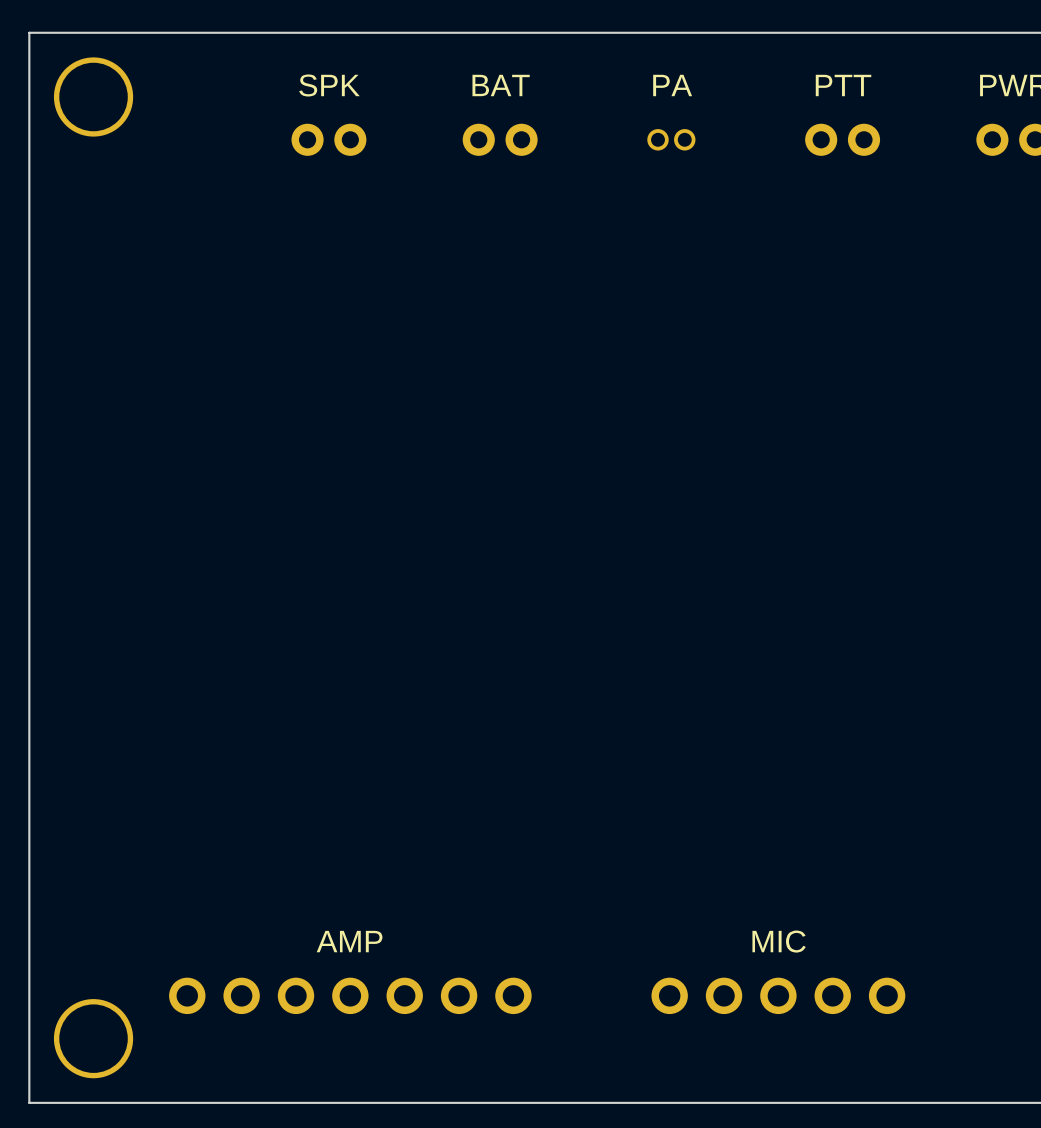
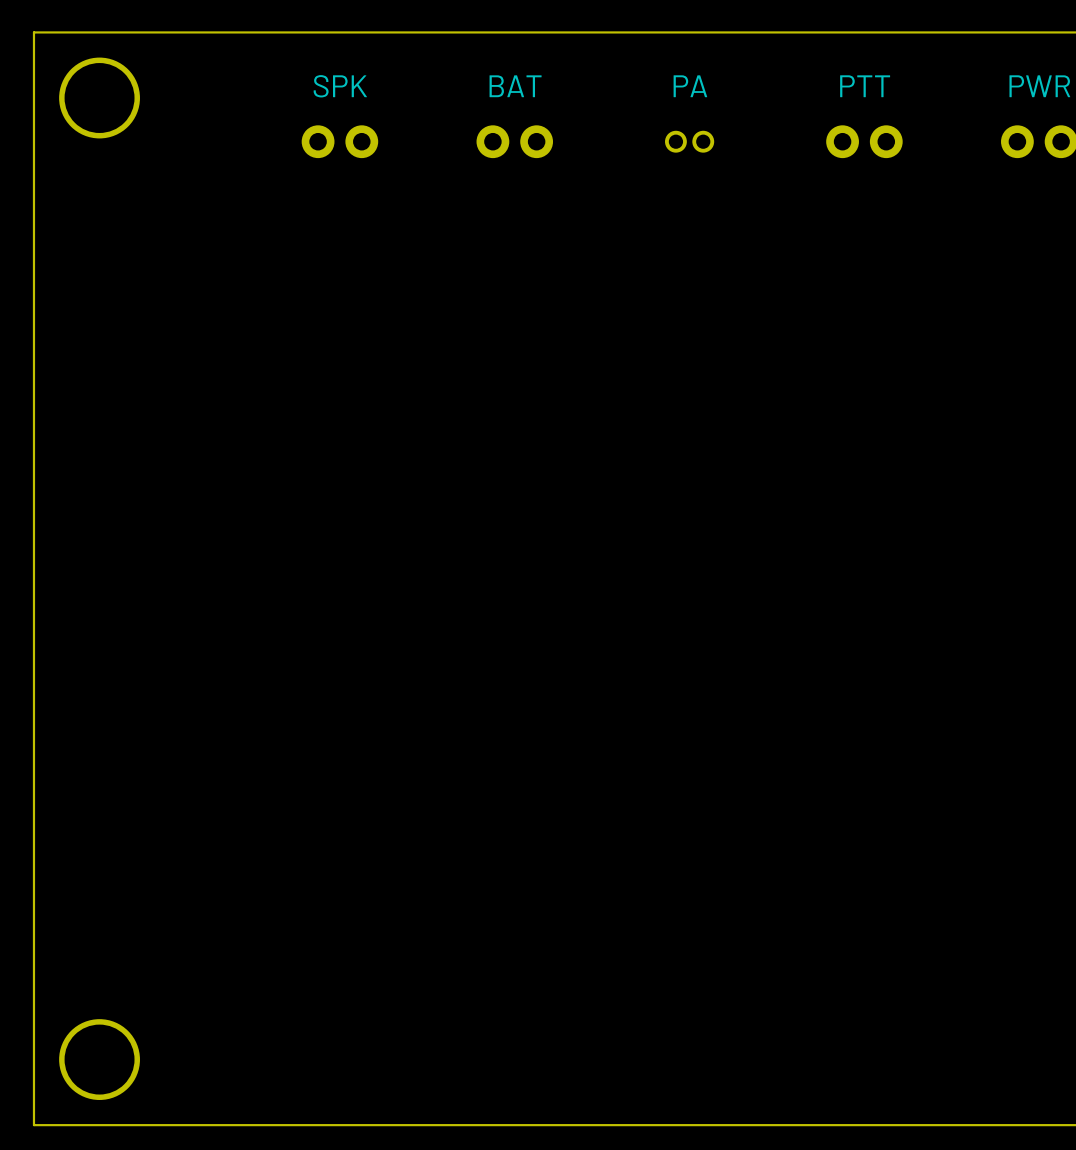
AMP: (350, 995) -> none
MIC: (778, 995) -> none

